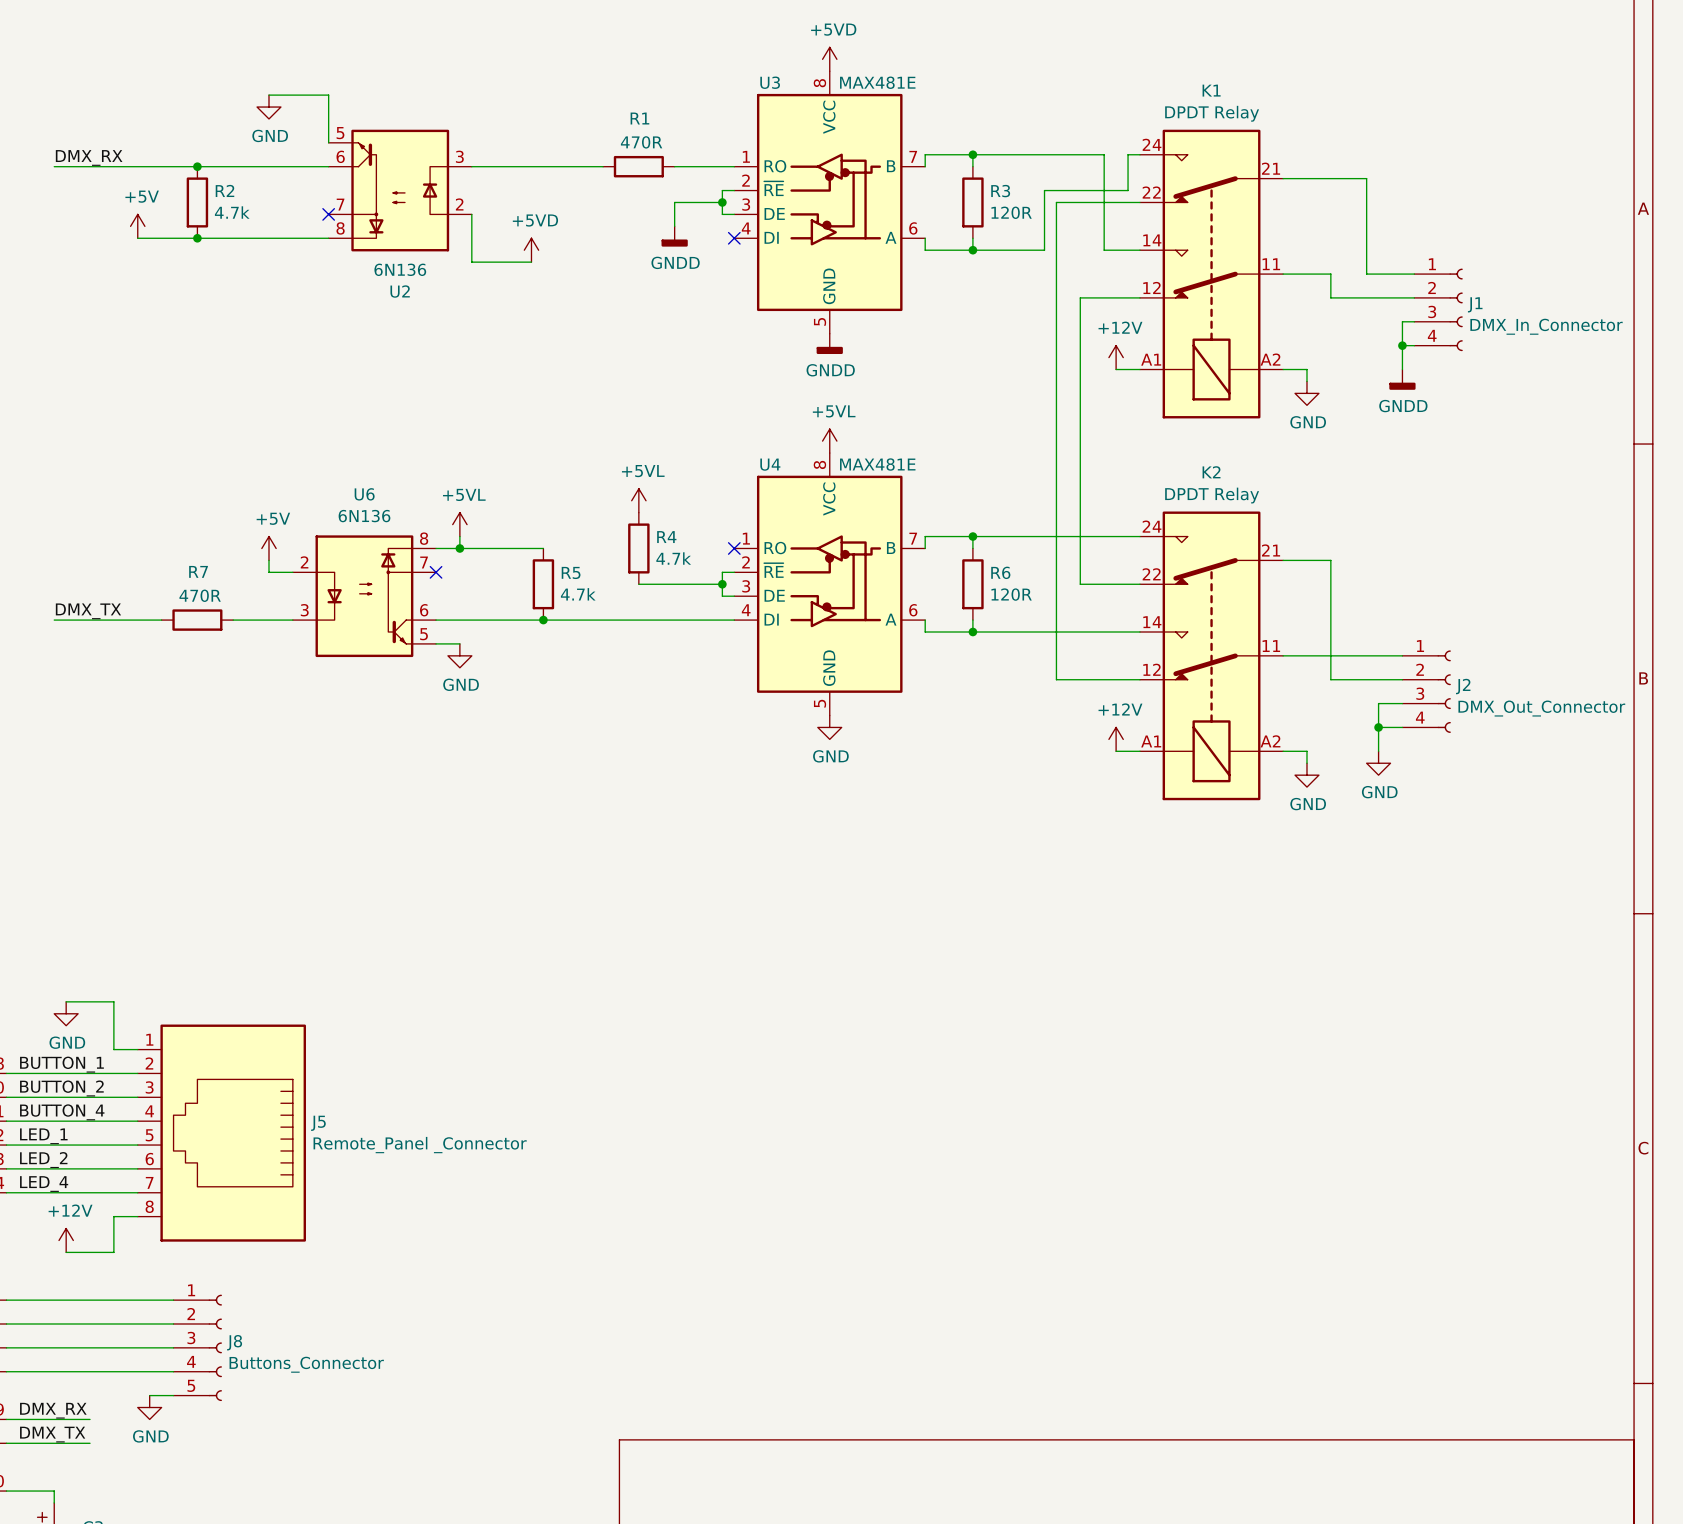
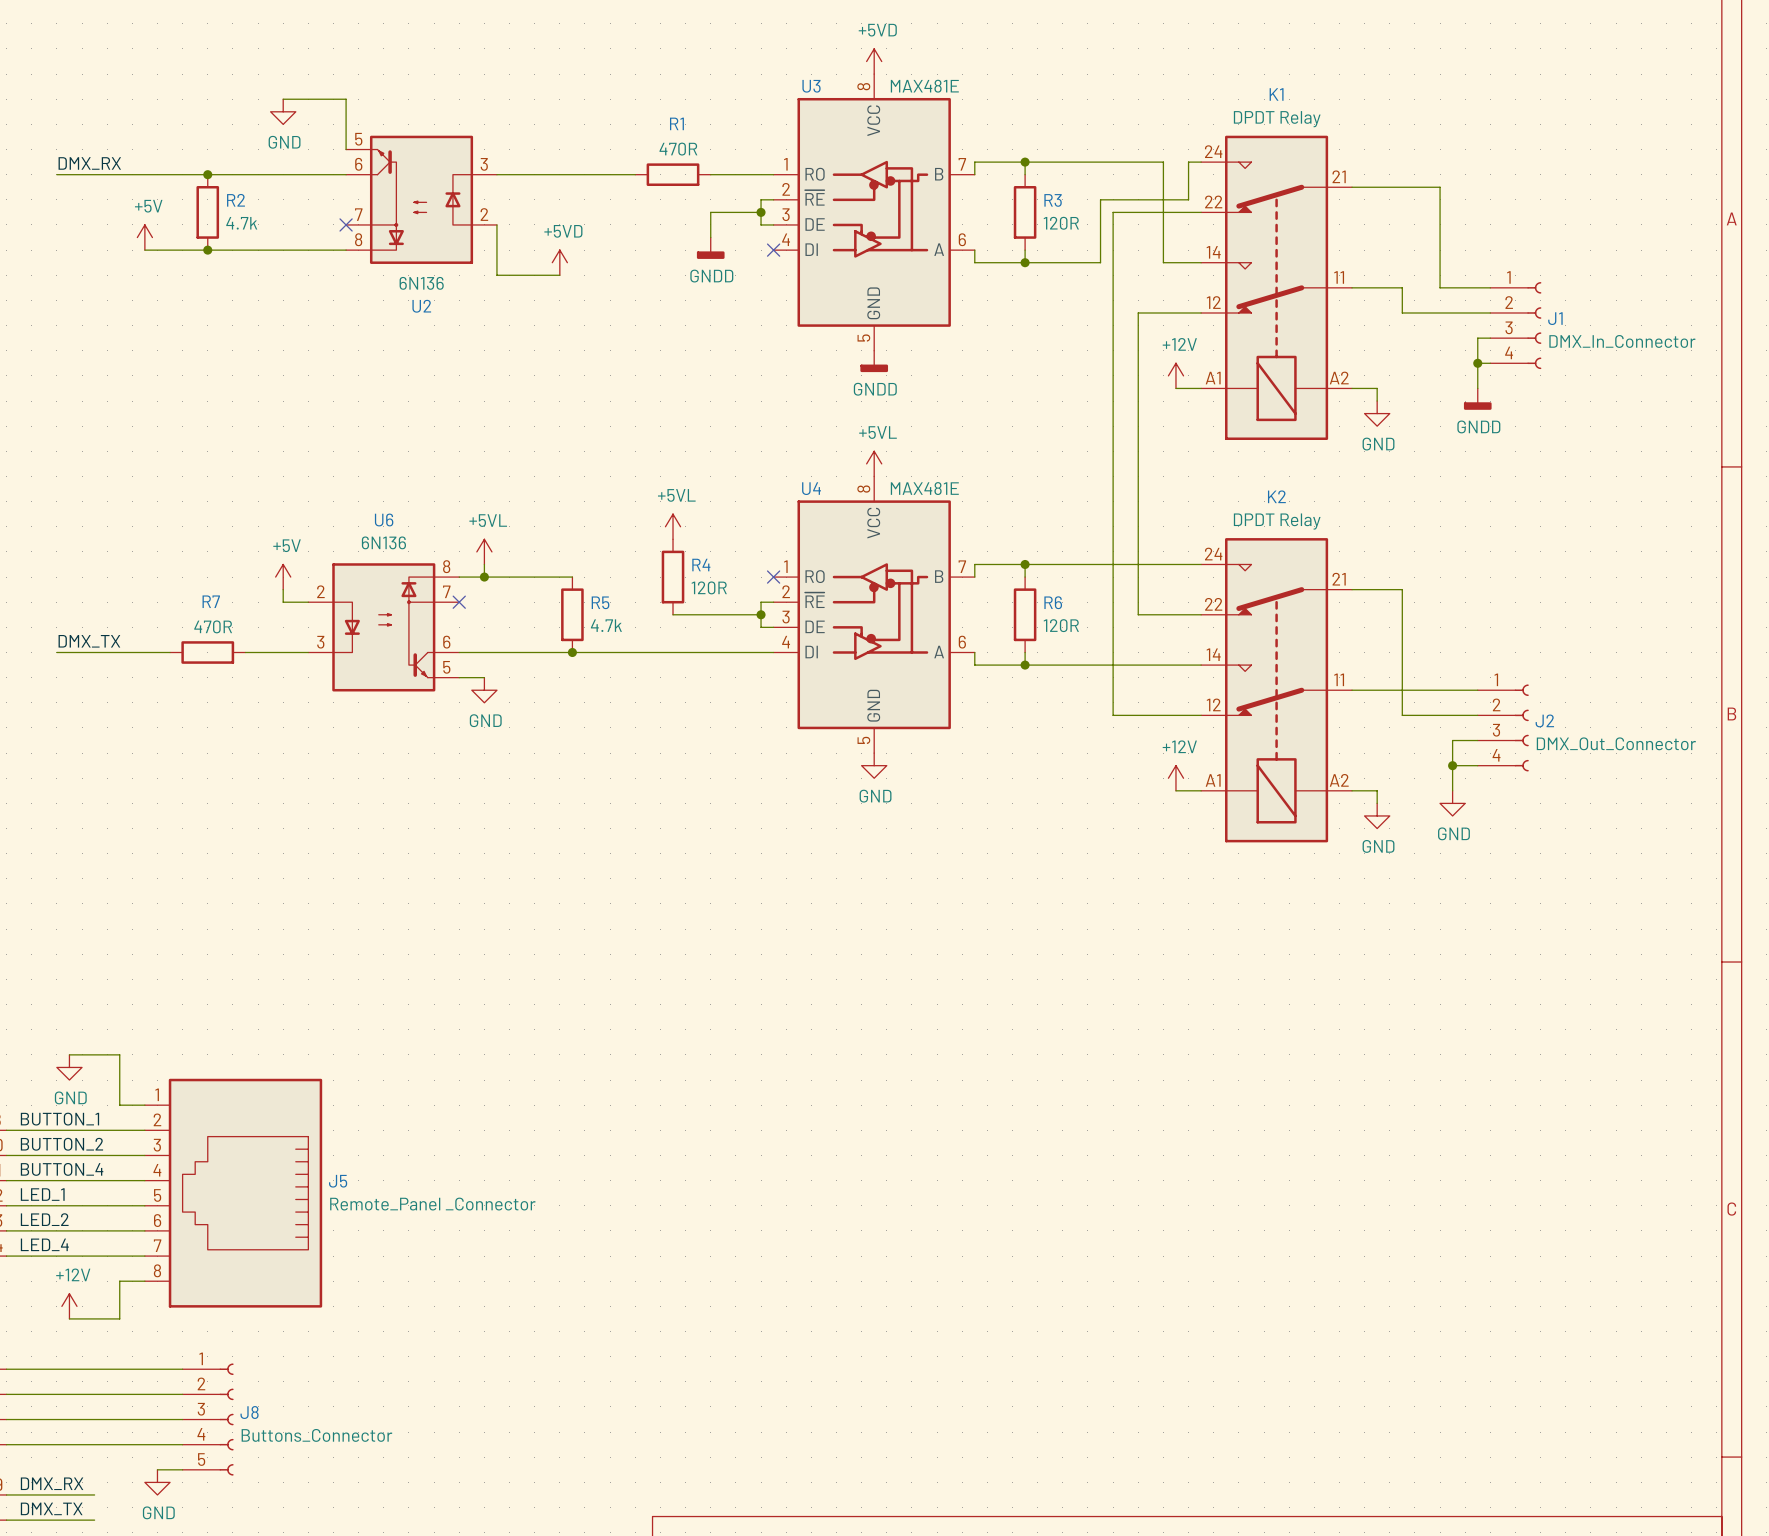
R4 value: 4.7k (673, 558) -> 120R (709, 587)

